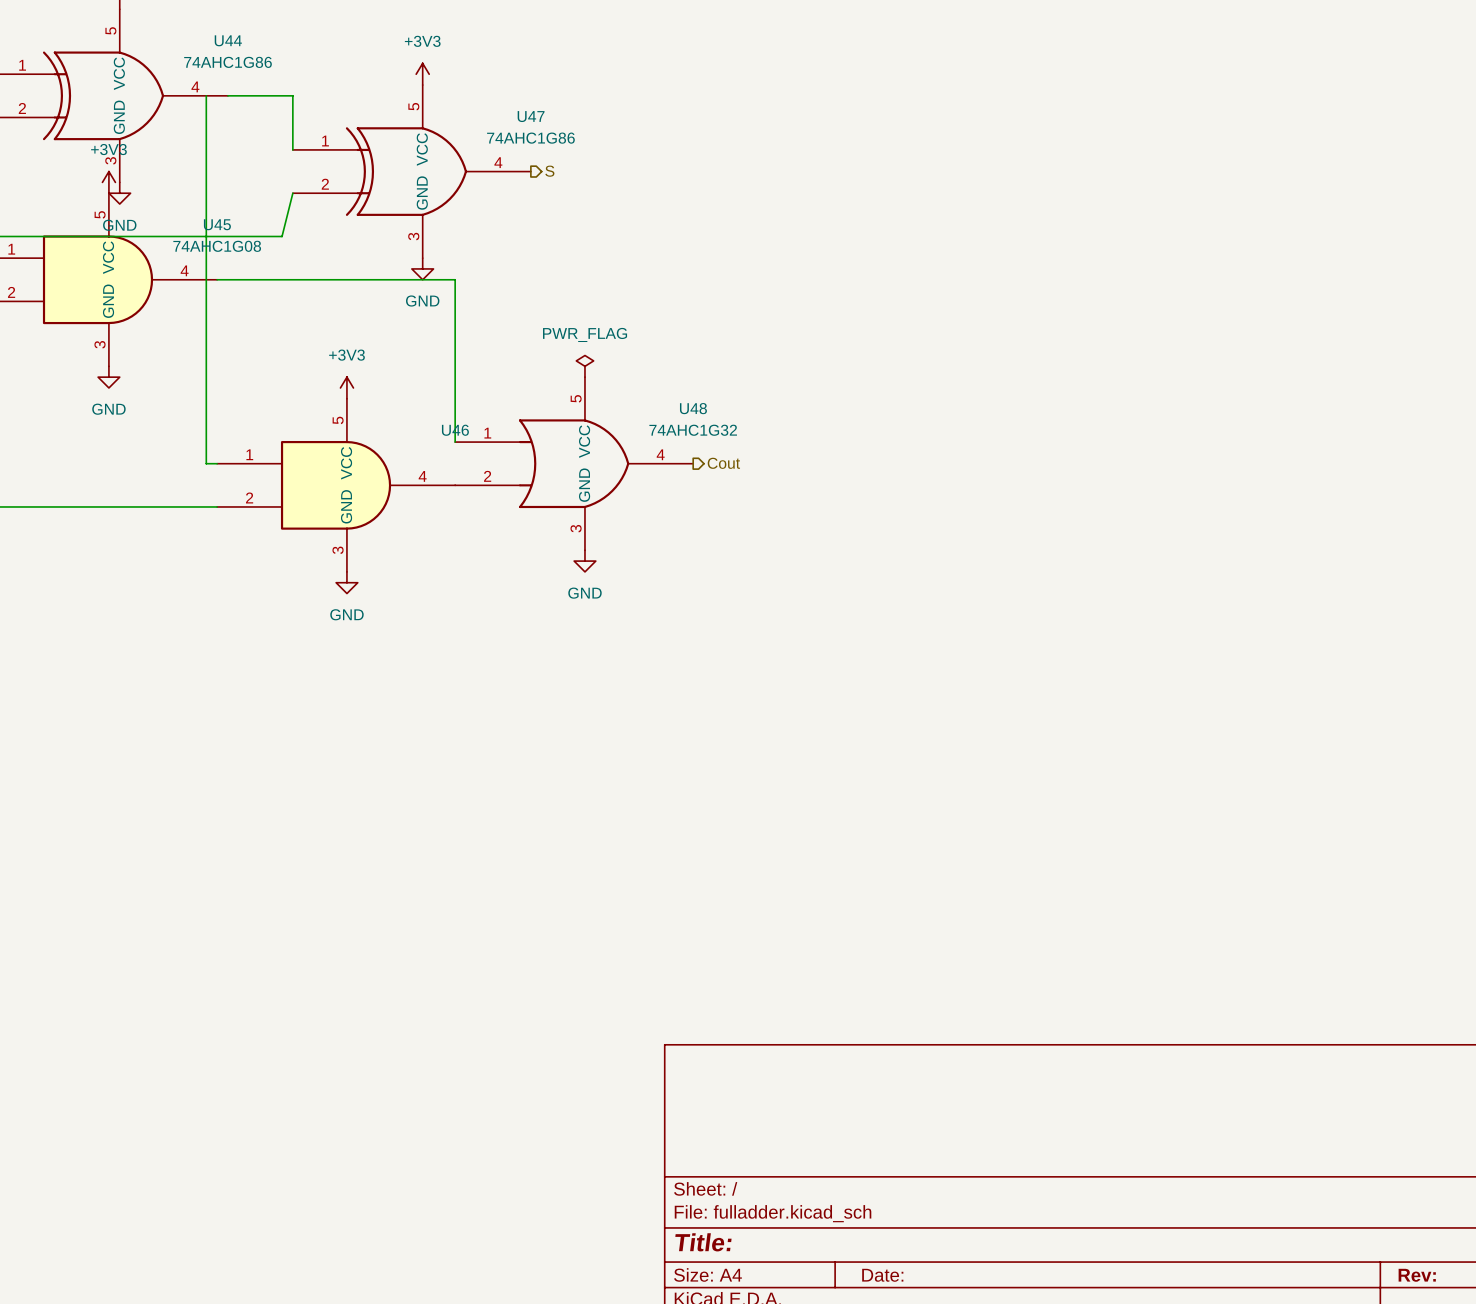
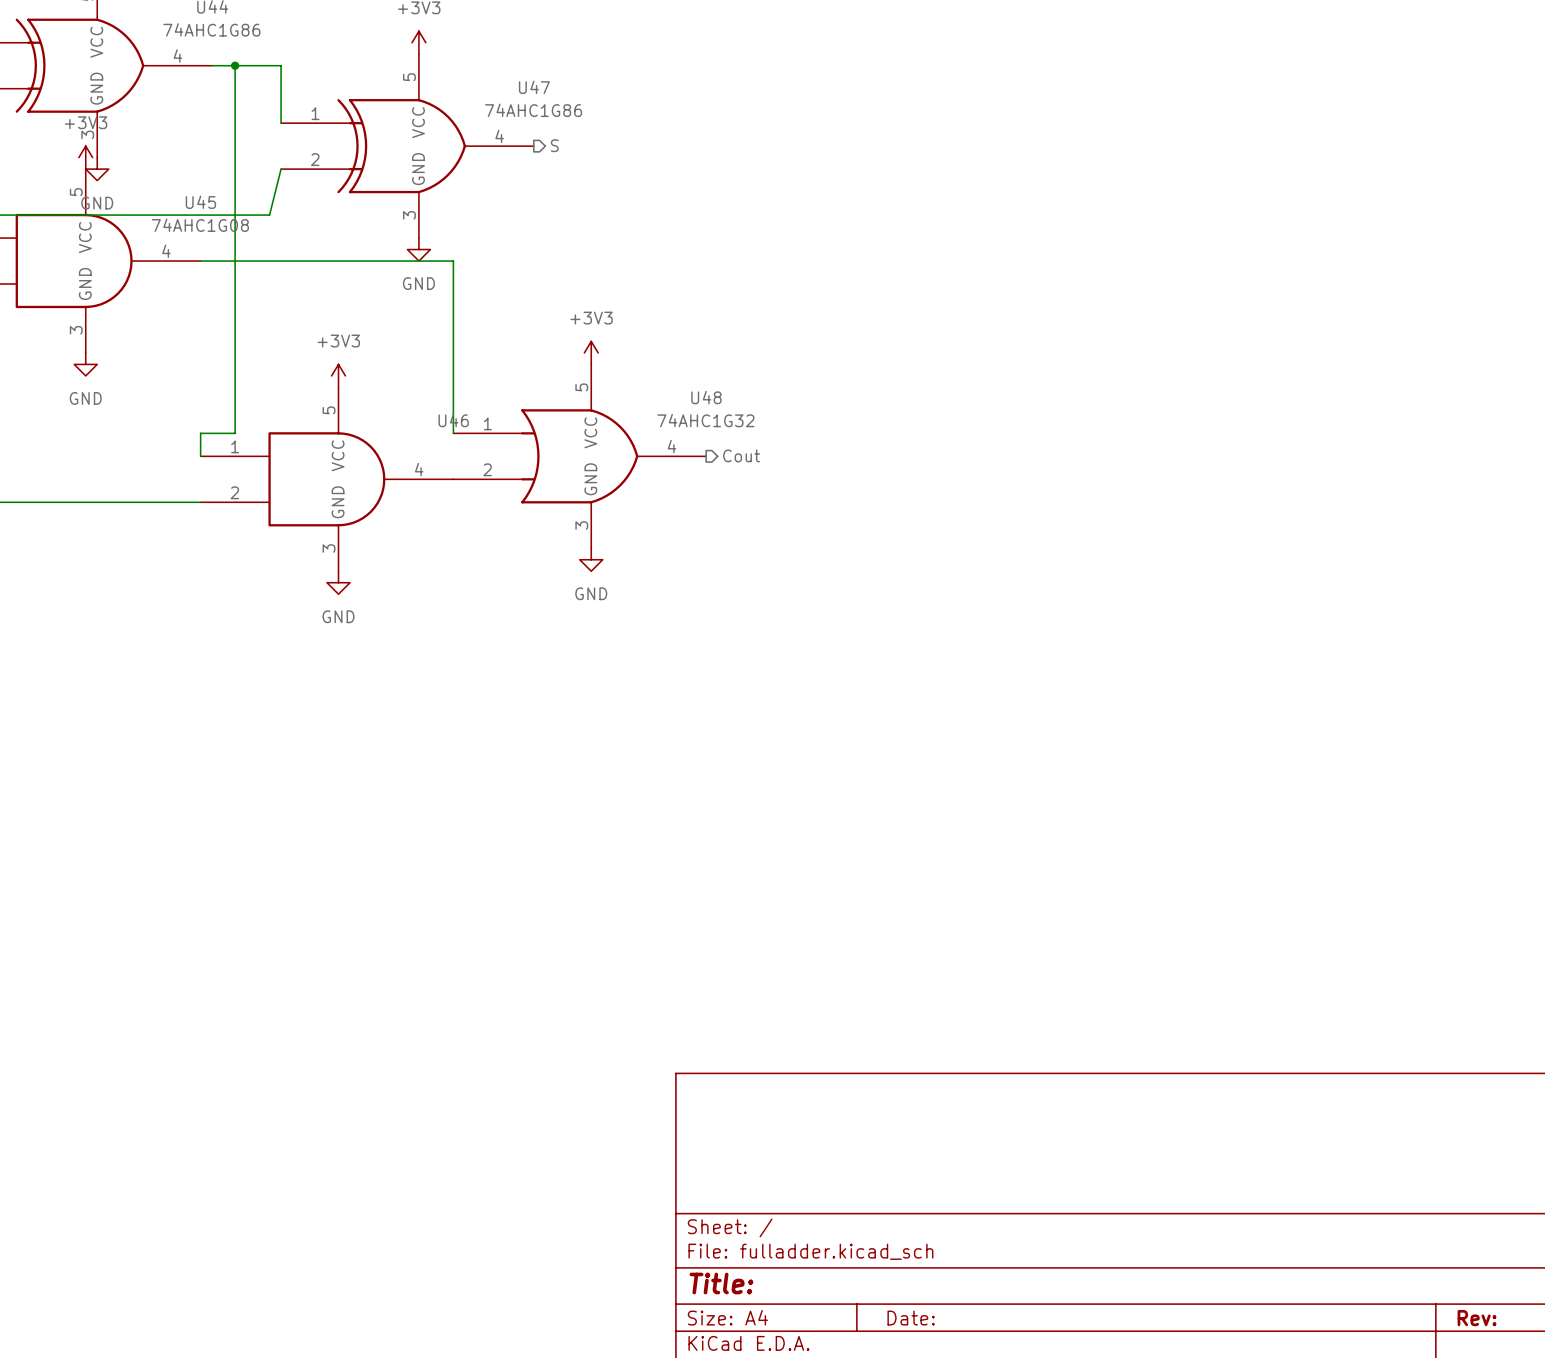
wire: (206, 95) (206, 463) (217, 463) -> (235, 65) (235, 433) (200, 433) (200, 456)
junction: none -> (235, 65)
power symbol: PWR_FLAG (584, 366) -> +3V3 (591, 352)

